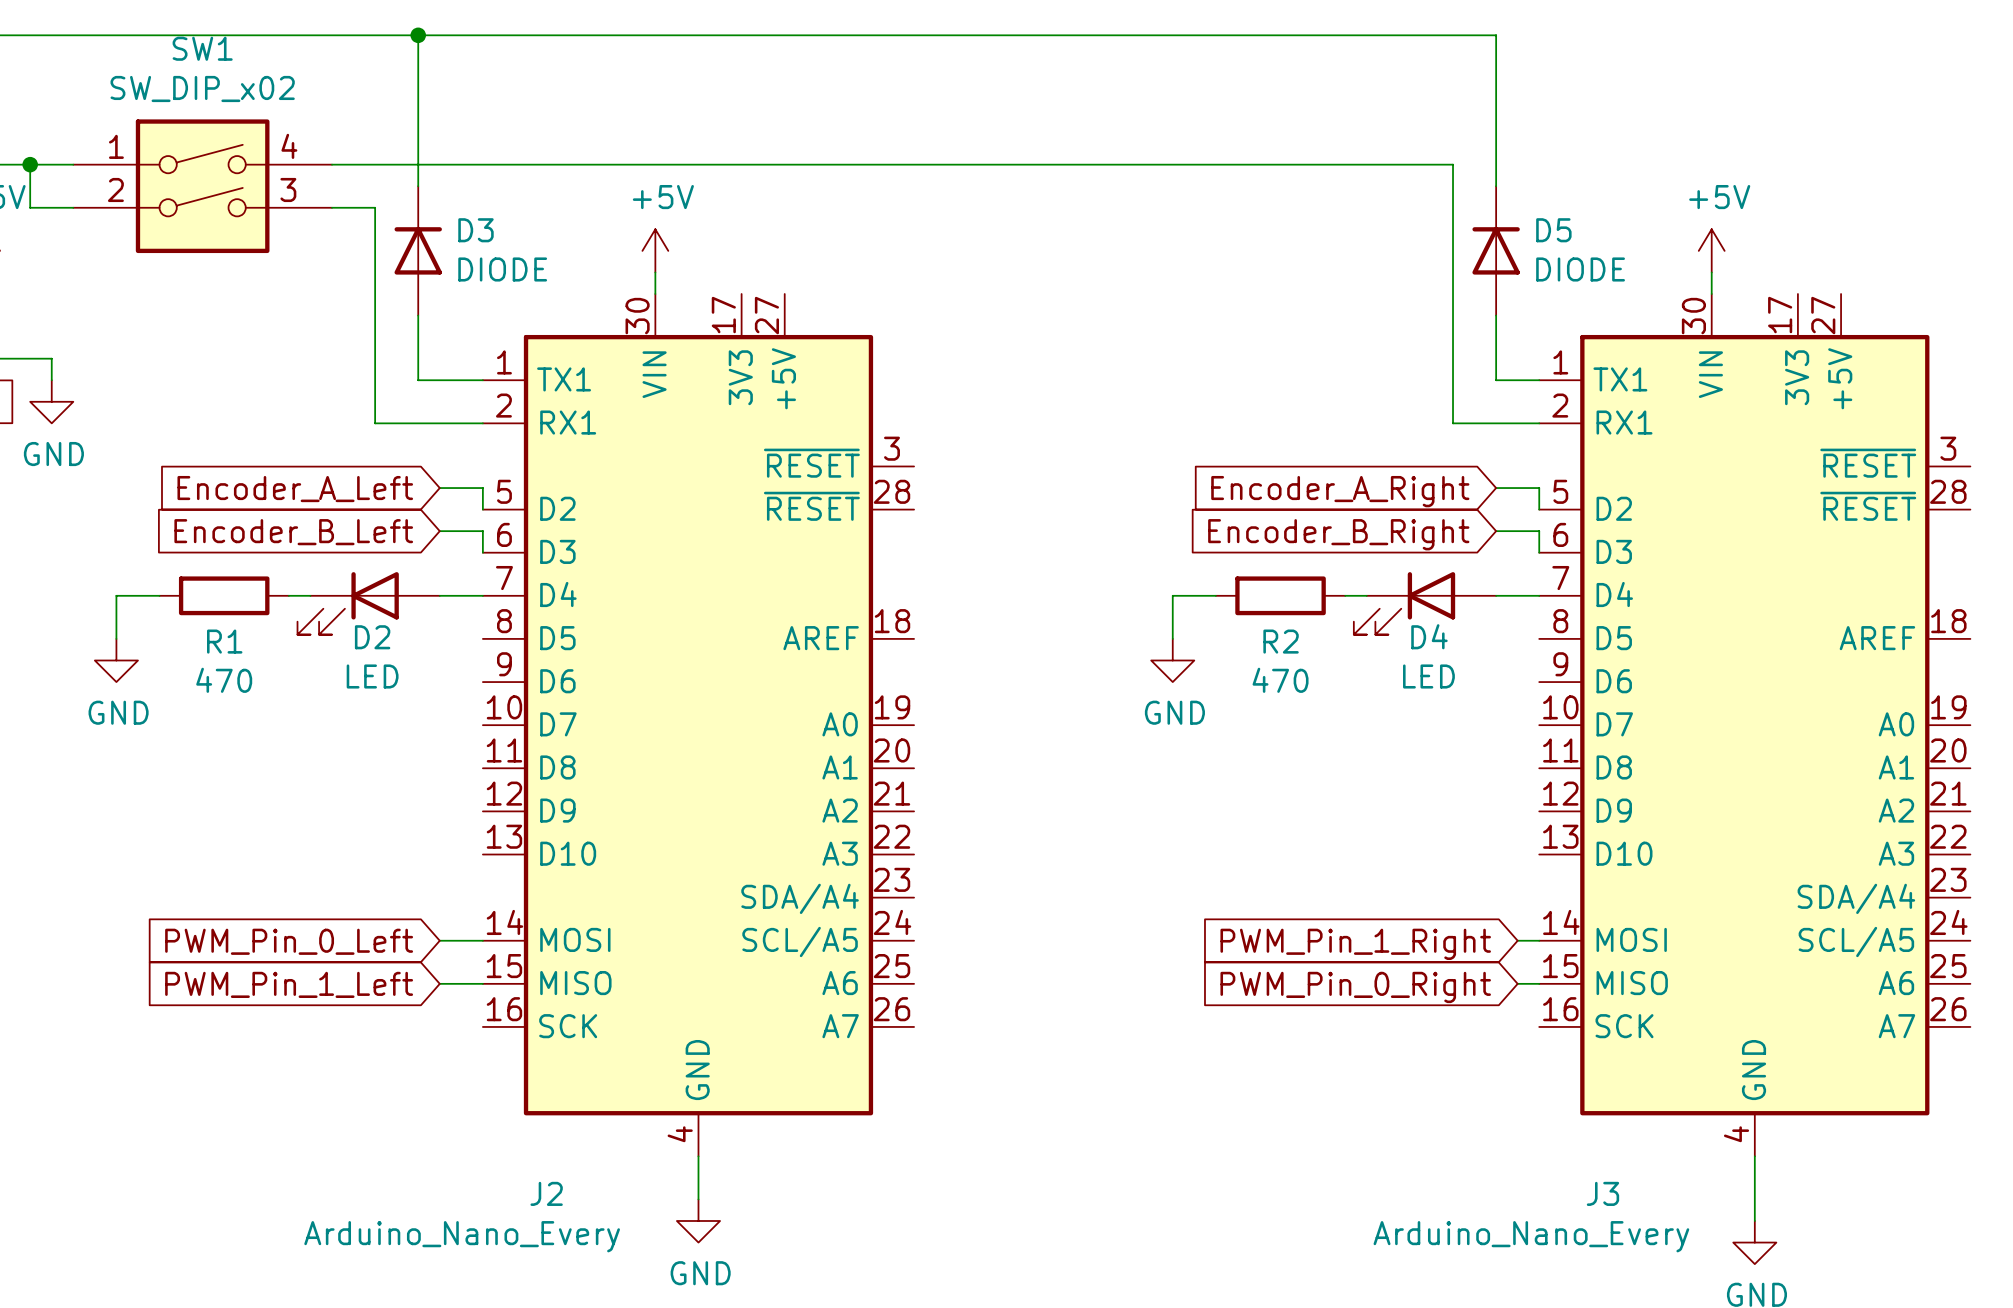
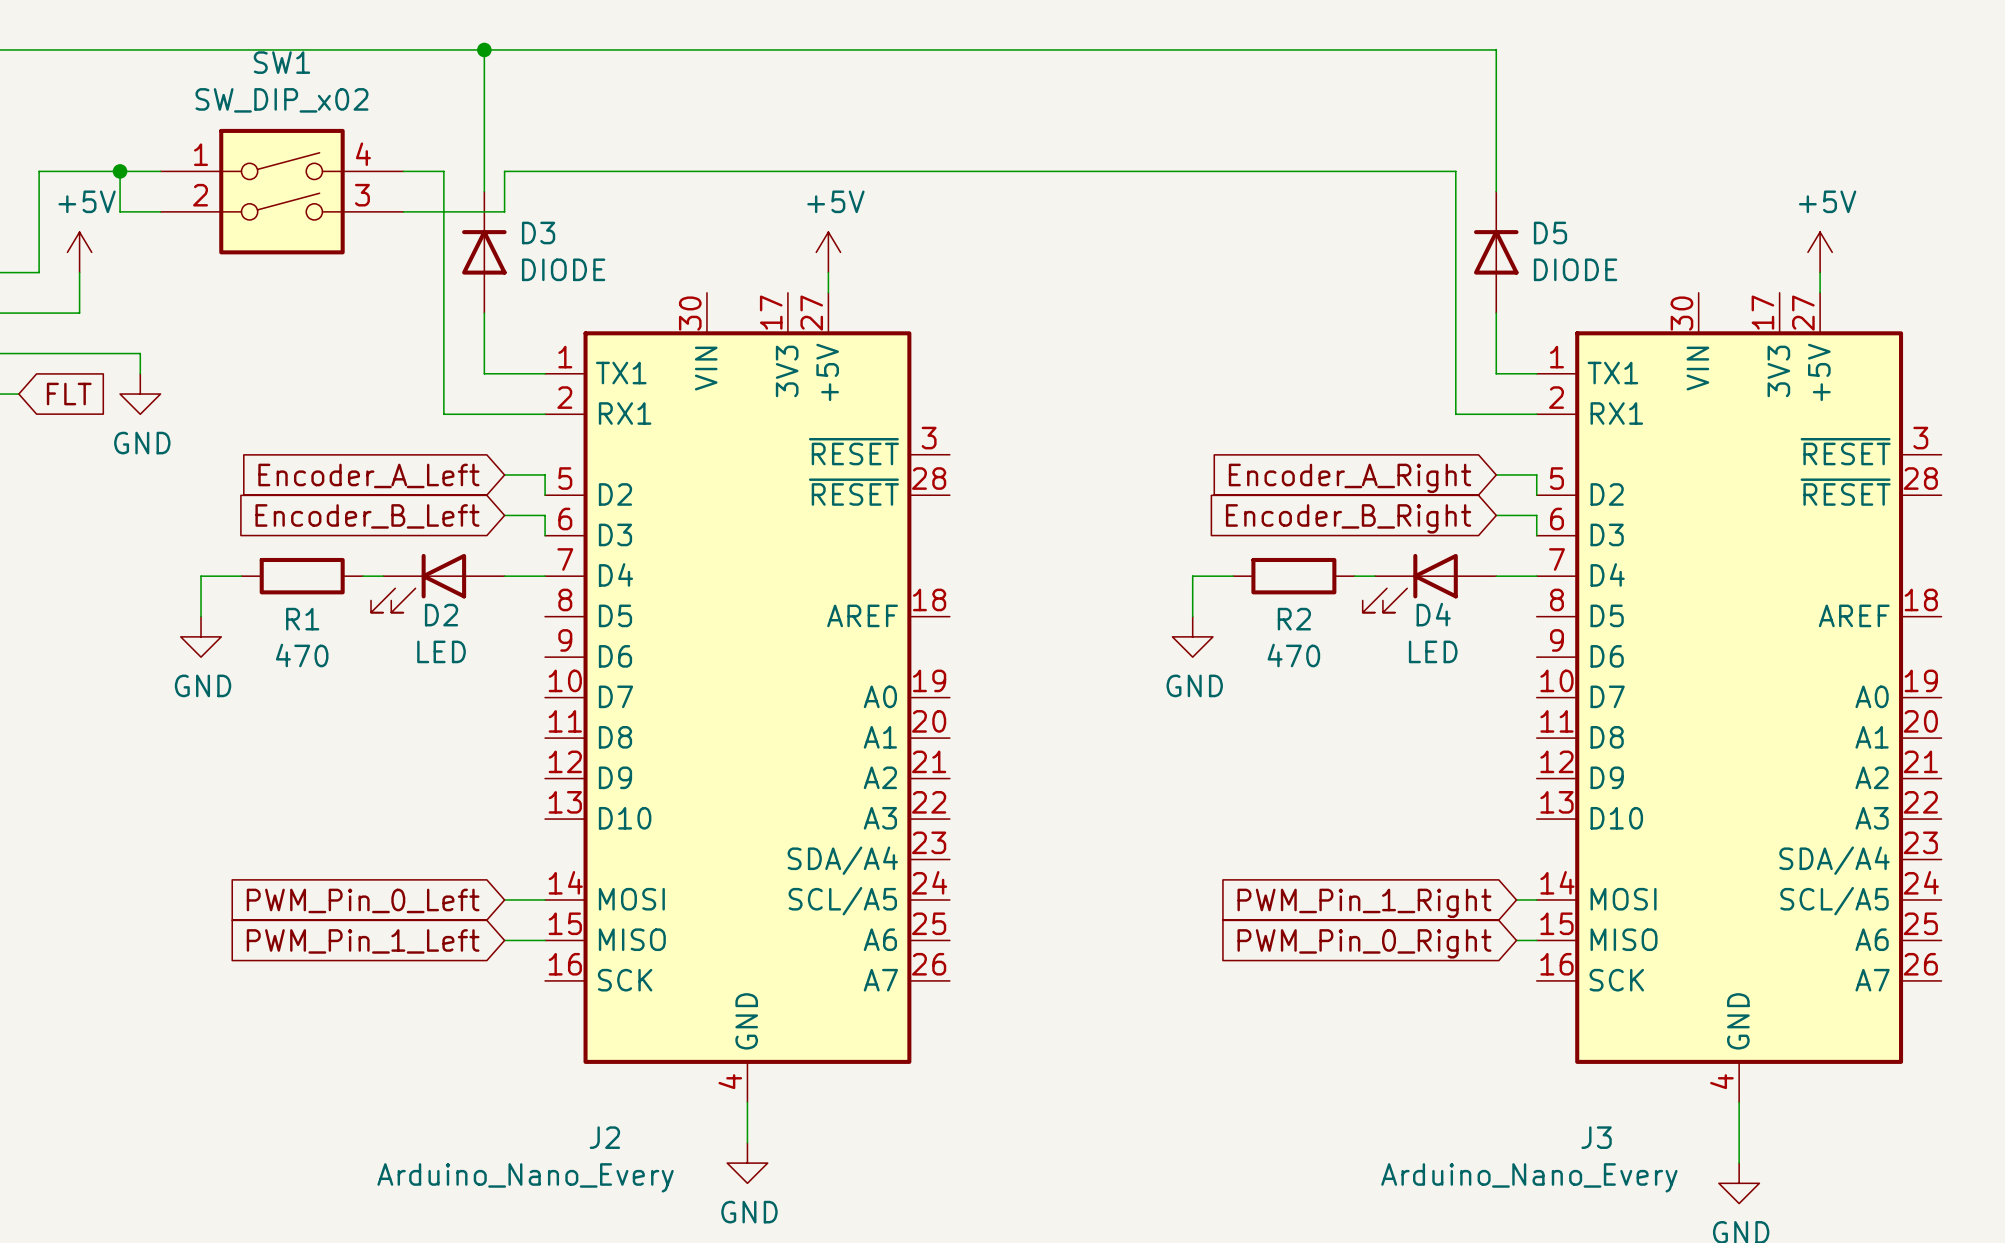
wire: (375, 164) (439, 164) -> (443, 171) (443, 211) (504, 211) (504, 171)
power symbol position: +5V (655, 250) -> +5V (828, 252)
power symbol position: +5V (1711, 250) -> +5V (1820, 252)
wire: (655, 272) (655, 294) -> (828, 272) (828, 292)
wire: (1711, 272) (1711, 294) -> (1820, 272) (1820, 292)

